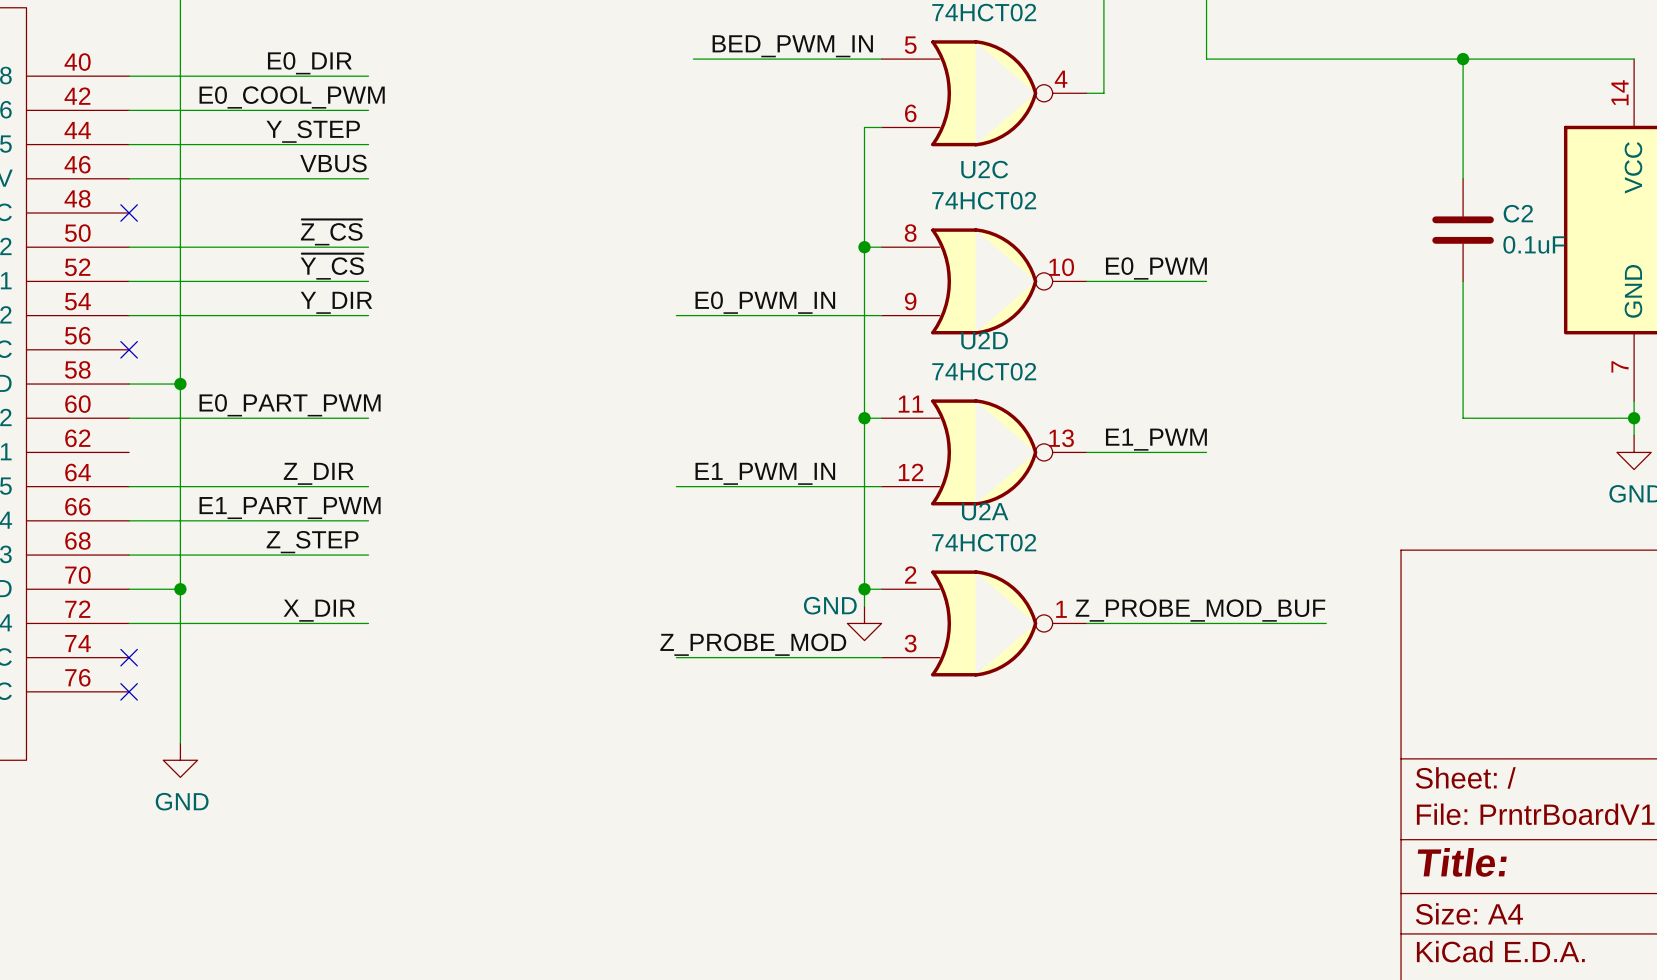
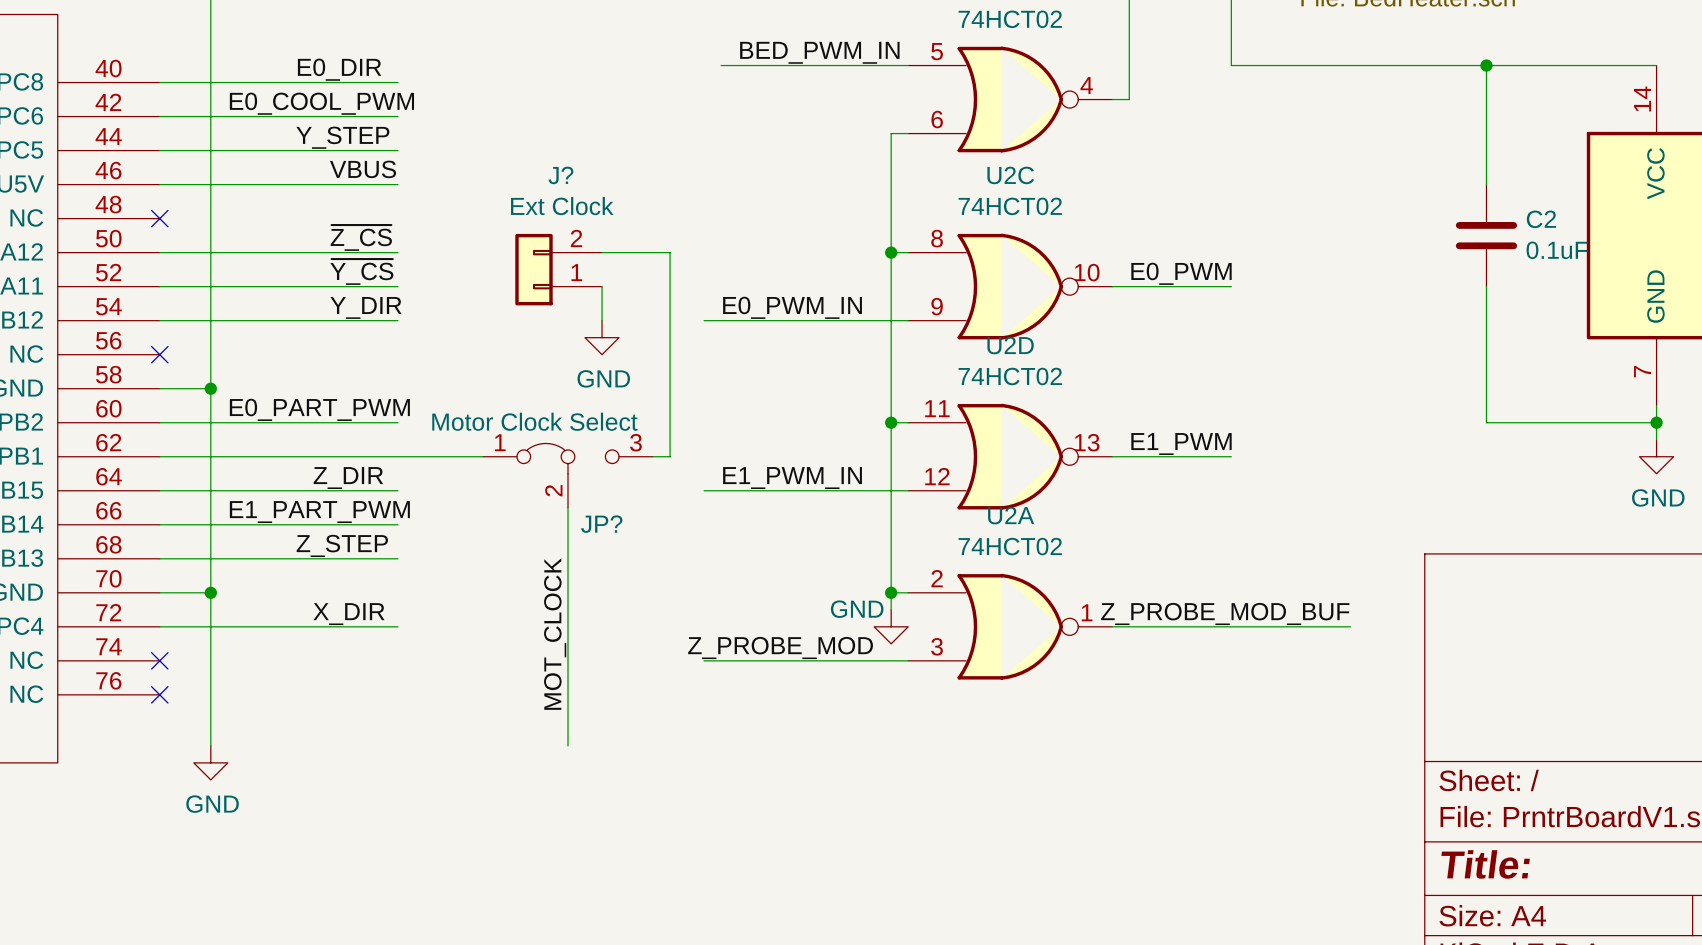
wire: none -> (602, 252) (670, 252) (670, 456) (653, 456)
J?: none -> Ext Clock (558, 269)
wire: none -> (602, 286) (602, 320)
power symbol: none -> GND (602, 337)
wire: none -> (159, 456) (482, 456)
JP?: none -> Motor Clock Select (568, 475)
wire: none -> (568, 507) (568, 745)
label: none -> MOT_CLOCK (555, 634)

